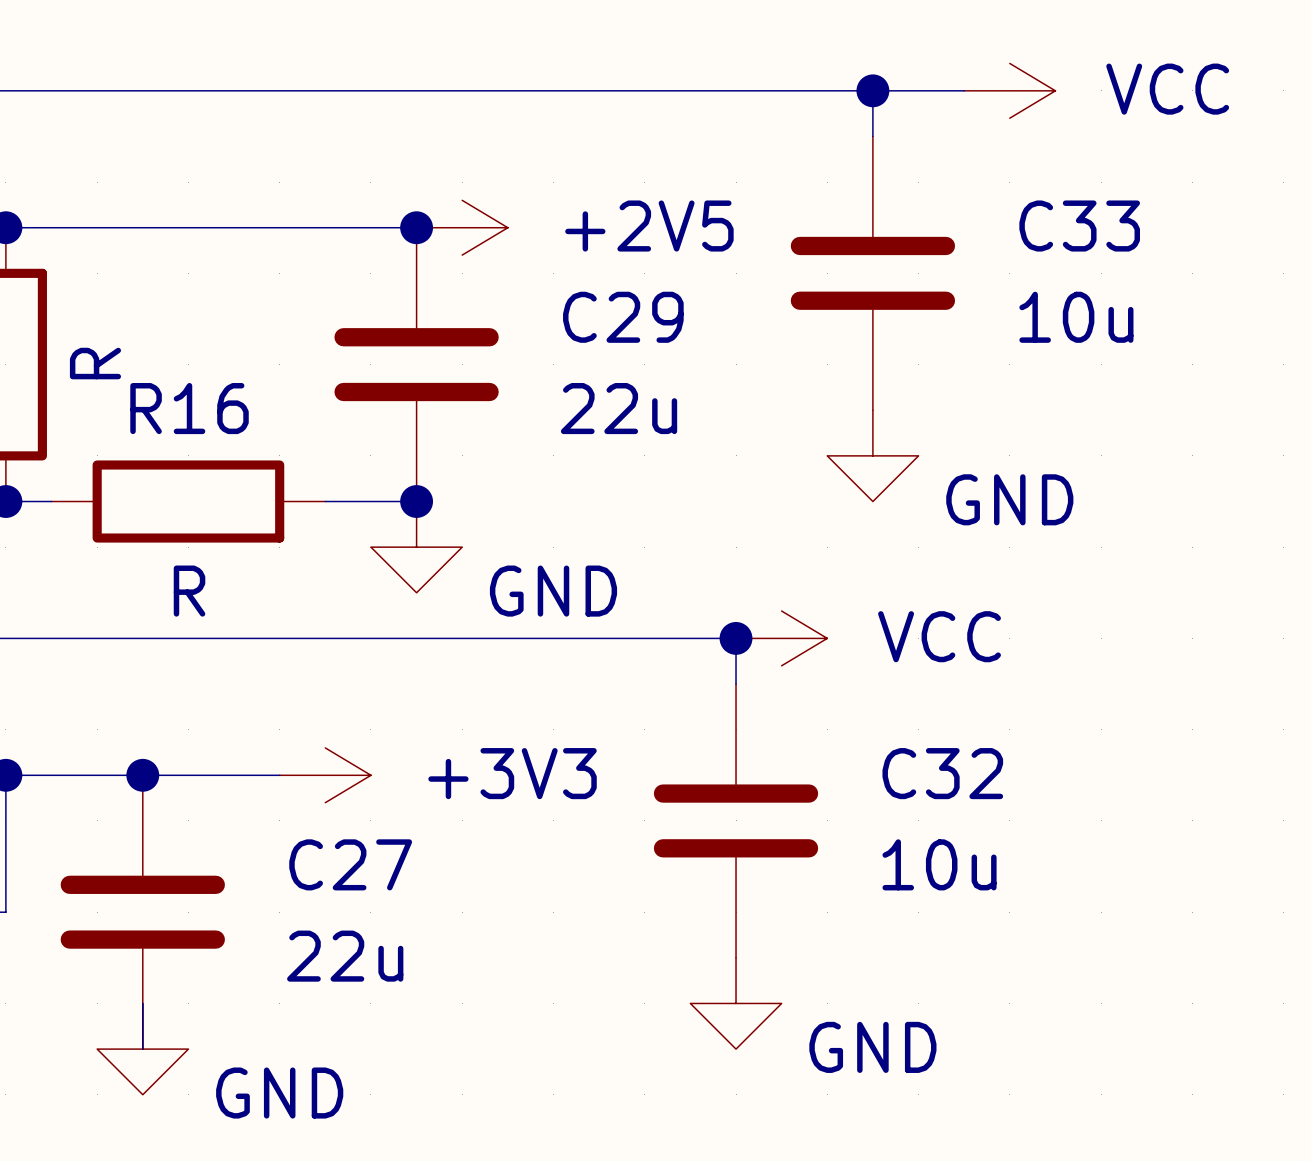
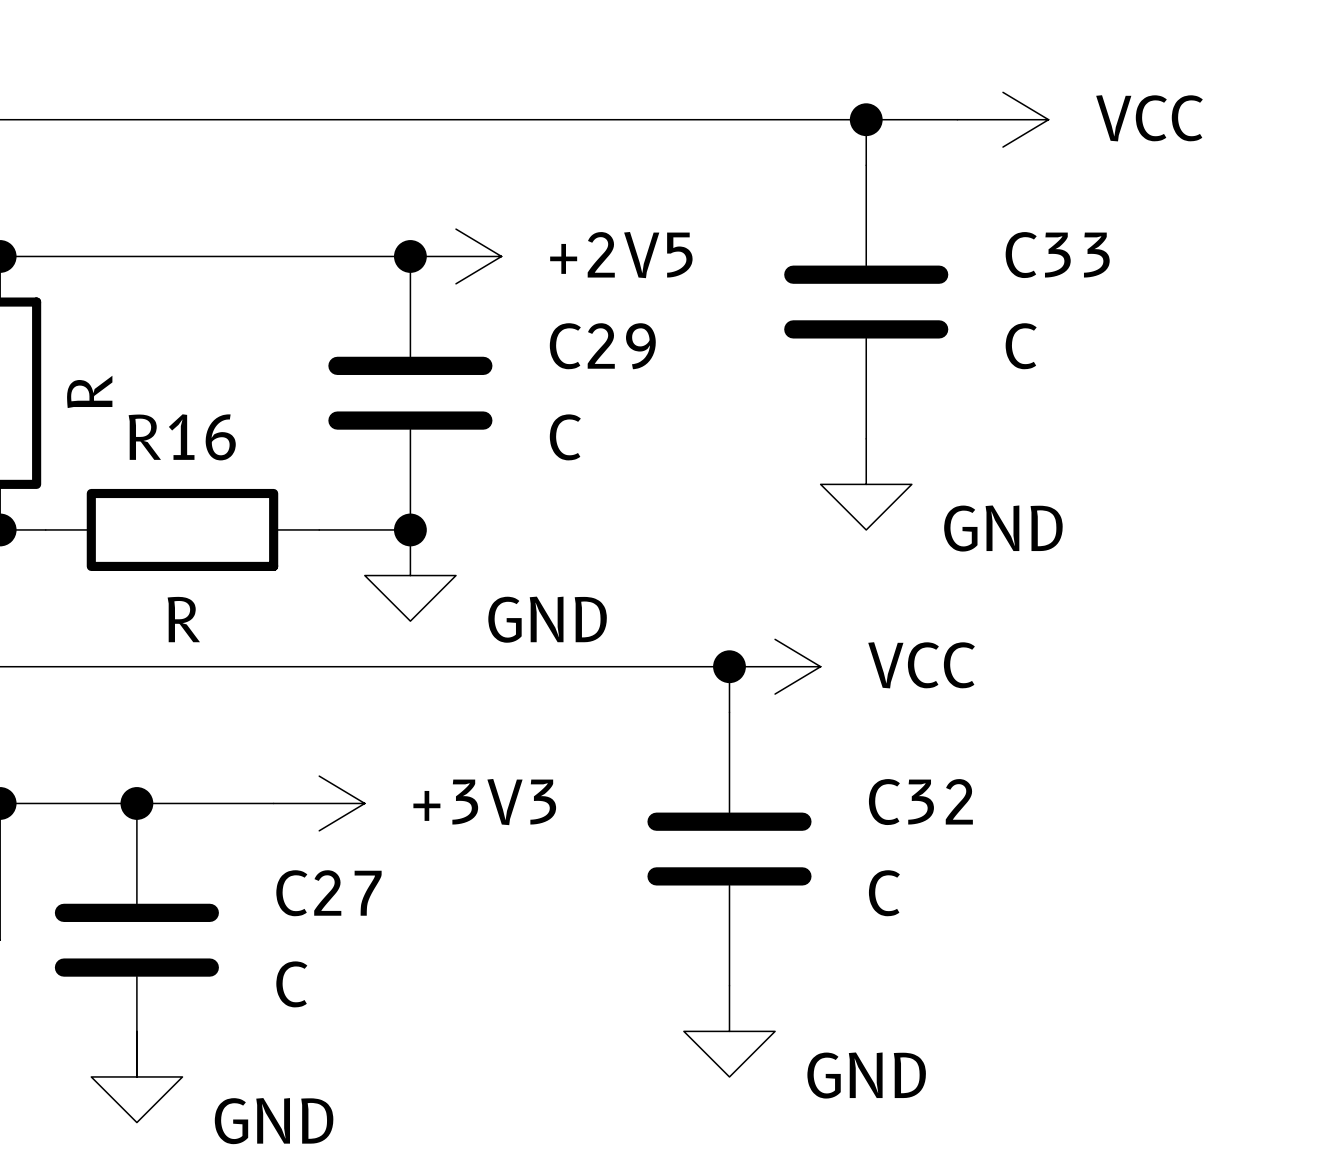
C33 value: 10u (1076, 317) -> C (1021, 346)
C29 value: 22u (619, 408) -> C (565, 437)
C32 value: 10u (939, 864) -> C (884, 893)
C27 value: 22u (345, 956) -> C (291, 984)

